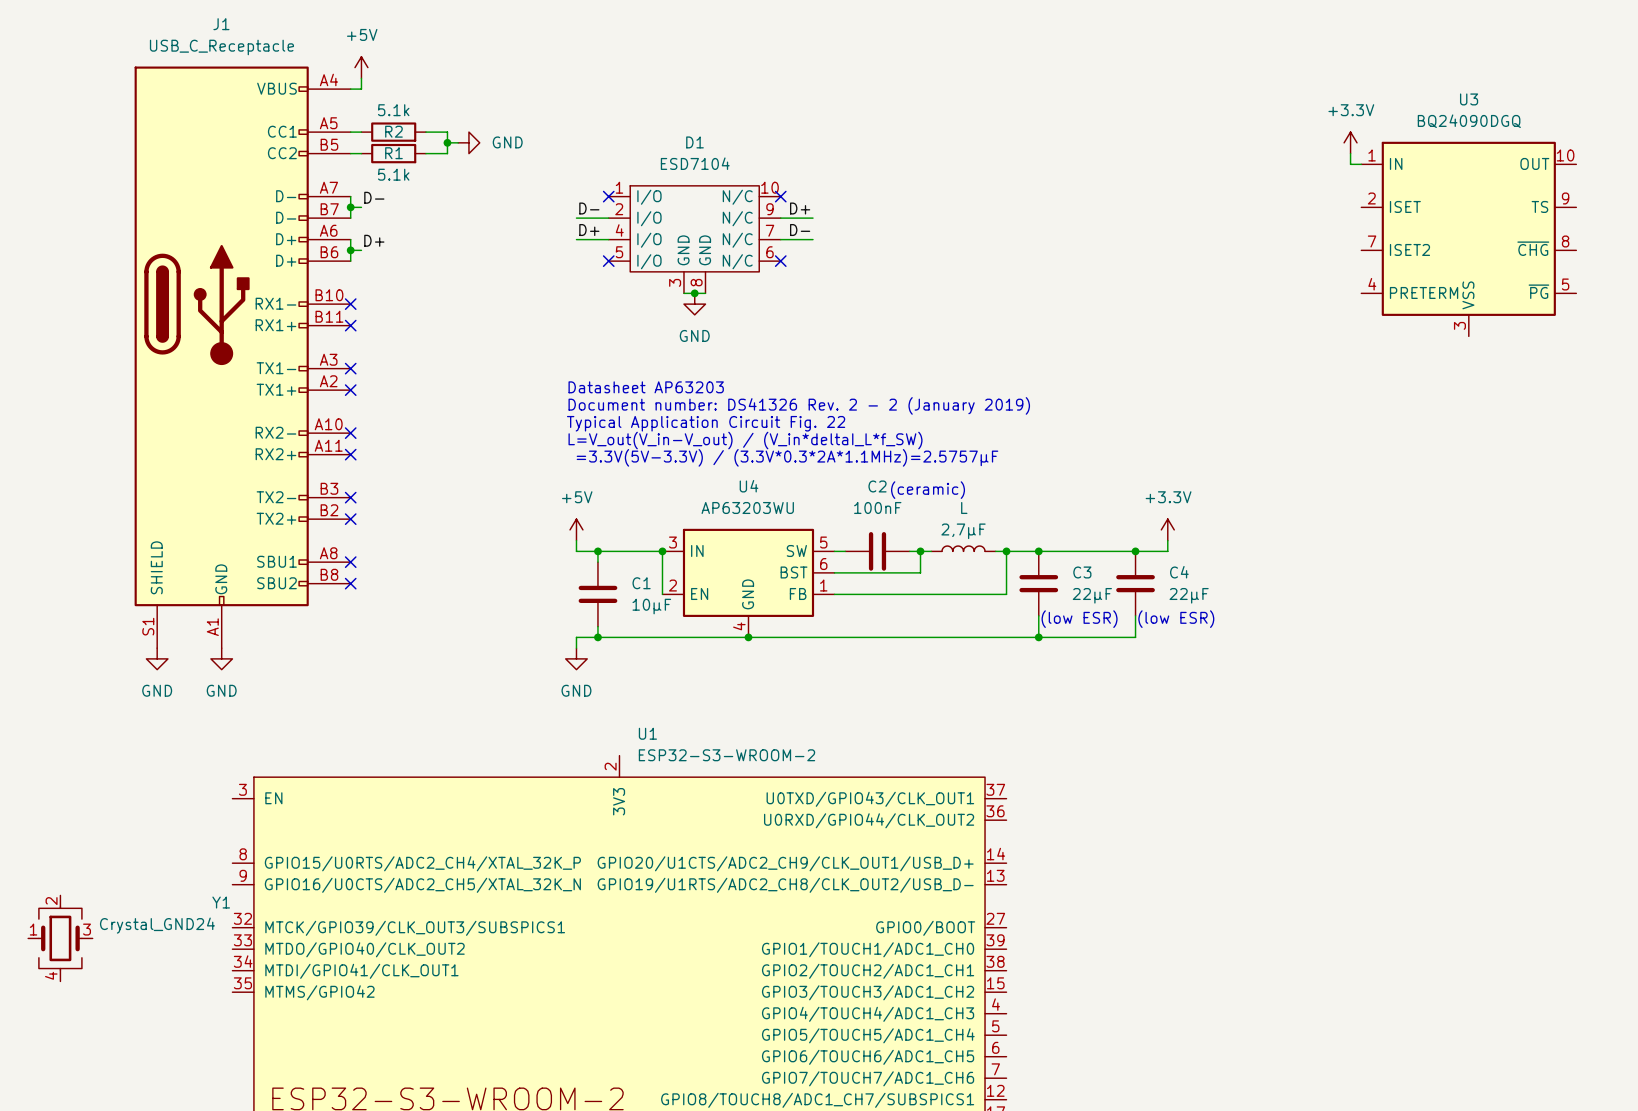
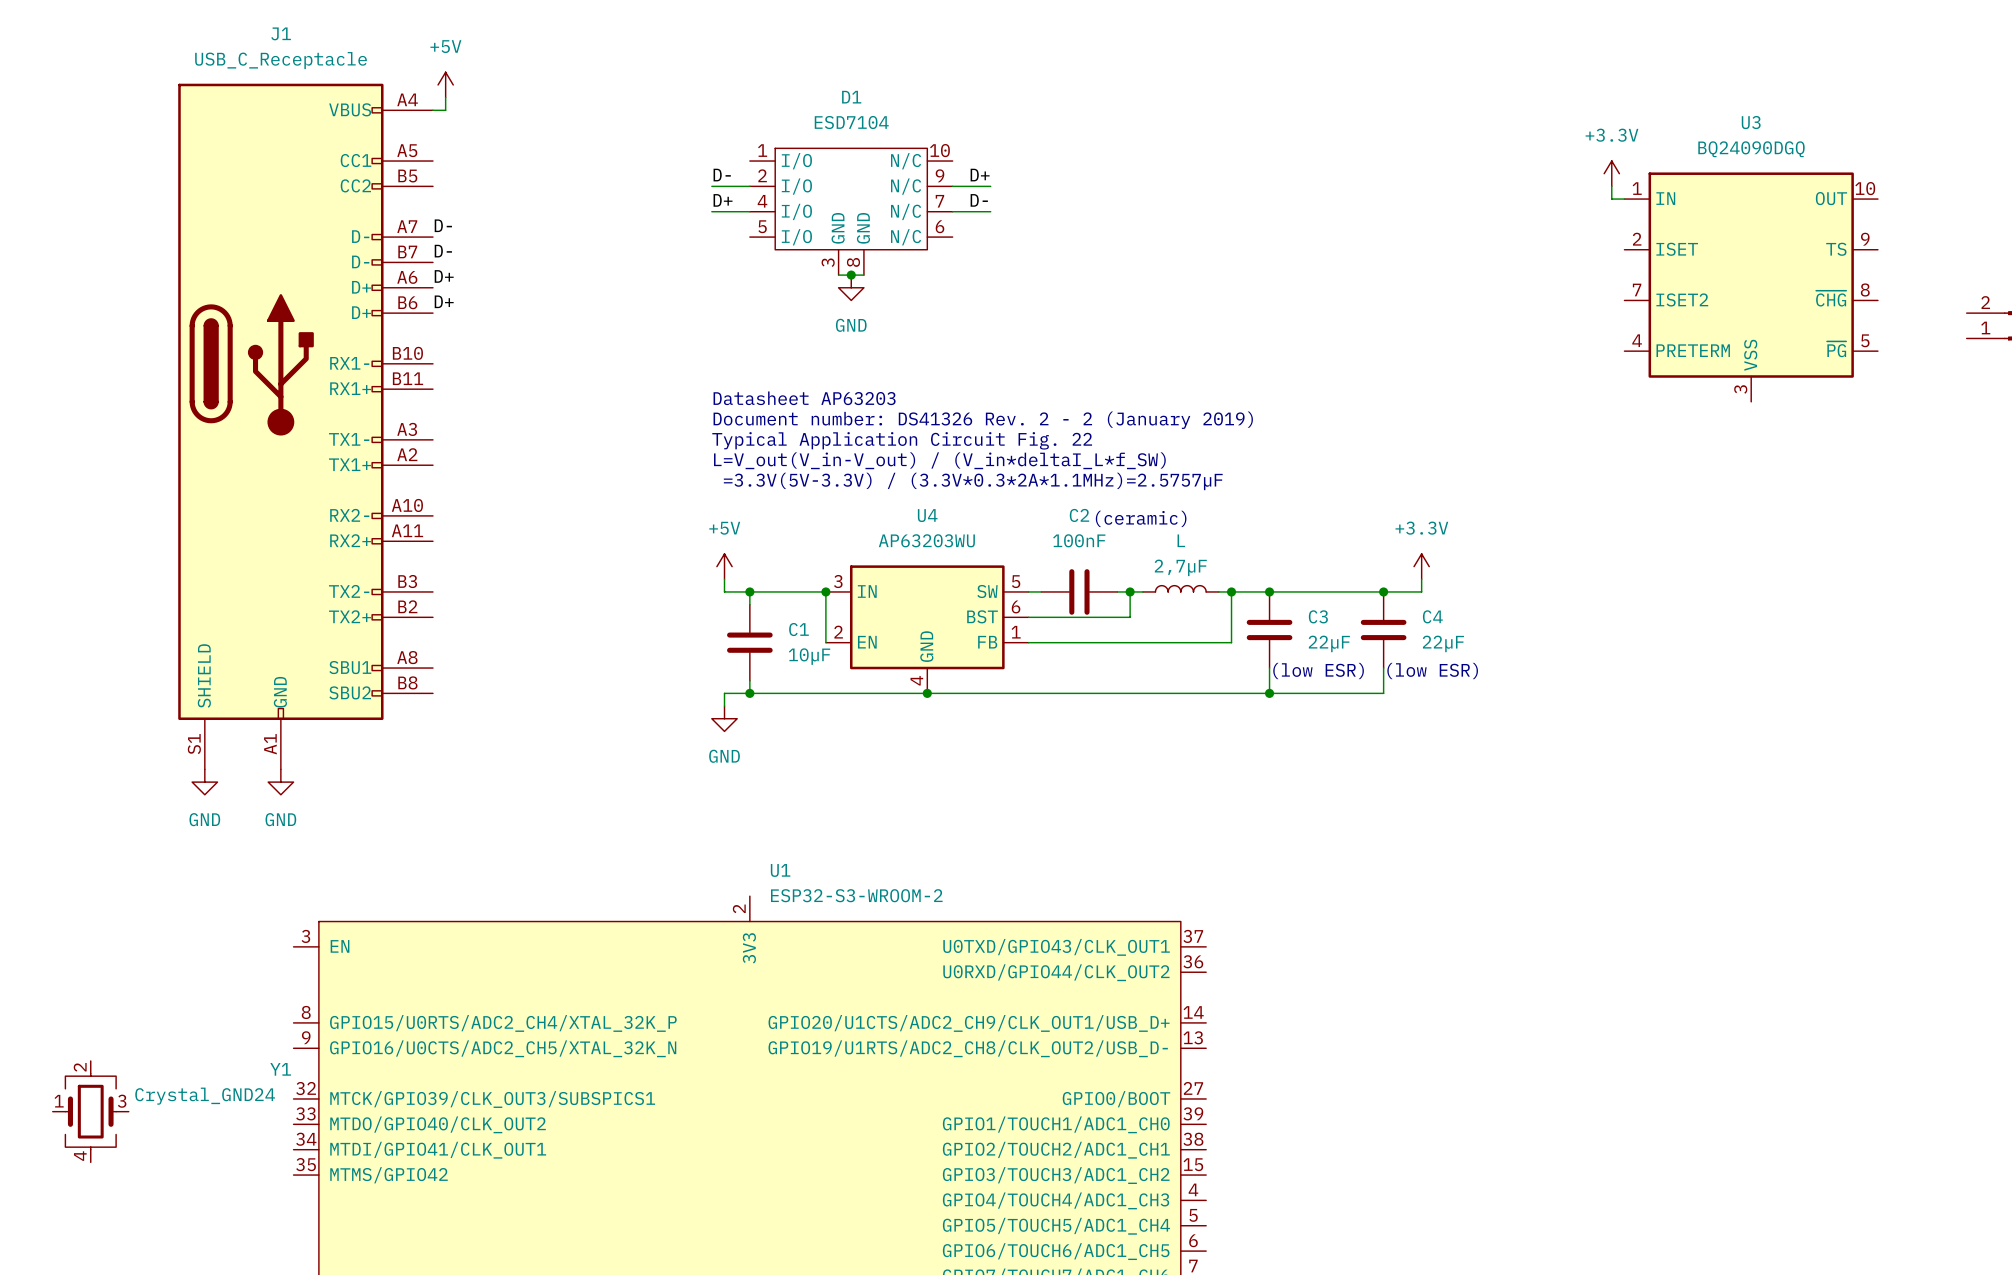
wire: (350, 132) (361, 132) -> none
R2: 5.1k (393, 132) -> none
wire: (425, 132) (447, 132) (447, 153) (425, 153) -> none
wire: (447, 142) (458, 142) -> none
junction: (447, 142) -> none
power symbol: GND (468, 142) -> none
wire: (350, 153) (361, 153) -> none
R1: 5.1k (393, 153) -> none
label: none -> D- (443, 225)
wire: (350, 196) (350, 218) -> none
no-connect mark: (608, 196) -> none
no-connect mark: (780, 196) -> none
label: D- (374, 197) -> none
wire: (350, 207) (361, 207) -> none
junction: (350, 207) -> none
label: none -> D- (443, 251)
label position: D- (589, 208) -> D- (722, 175)
label position: D+ (800, 208) -> D+ (980, 175)
wire: (576, 218) (608, 218) -> (711, 186) (749, 186)
wire: (780, 218) (813, 218) -> (952, 186) (990, 186)
junction: none -> (851, 275)
label: none -> D+ (444, 276)
label position: D+ (589, 230) -> D+ (723, 200)
label position: D- (800, 230) -> D- (979, 200)
wire: (350, 239) (350, 261) -> none
wire: (576, 239) (608, 239) -> (711, 211) (749, 211)
D1 position: (694, 239) -> (851, 211)
wire: (780, 239) (813, 239) -> (952, 211) (990, 211)
label: D+ (374, 240) -> none
wire: (350, 250) (361, 250) -> none
junction: (350, 250) -> none
label: none -> D+ (444, 301)
no-connect mark: (608, 261) -> none
no-connect mark: (780, 261) -> none
wire: (683, 293) (705, 293) -> (838, 275) (863, 275)
junction: (694, 293) -> none
no-connect mark: (350, 304) -> none
power symbol position: GND (694, 304) -> GND (851, 287)
no-connect mark: (350, 325) -> none
no-connect mark: (350, 368) -> none
text position: Datasheet AP63203 (646, 387) -> Datasheet AP63203 (804, 398)
no-connect mark: (350, 390) -> none
text position: Document number: DS41326 Rev. 2 - 2 (January 2019) (799, 405) -> Document number: DS41326 Rev. 2 - 2 (January 2019) (983, 420)
text position: Typical Application Circuit Fig. 22 (706, 423) -> Typical Application Circuit Fig. 22 (902, 440)
no-connect mark: (350, 433) -> none
text position: L=V_out(V_in-V_out) / (V_in*deltaI_L*f_SW) (745, 440) -> L=V_out(V_in-V_out) / (V_in*deltaI_L*f_SW) (939, 460)
no-connect mark: (350, 454) -> none
text position: =3.3V(5V-3.3V) / (3.3V*0.3*2A*1.1MHz)=2.5757µF (787, 457) -> =3.3V(5V-3.3V) / (3.3V*0.3*2A*1.1MHz)=2.5757µF (973, 481)
text position: (ceramic) (928, 490) -> (ceramic) (1141, 518)
no-connect mark: (350, 497) -> none
junction: none -> (749, 591)
junction: none -> (825, 591)
junction: none -> (1130, 591)
junction: none -> (1231, 591)
junction: none -> (1269, 591)
junction: none -> (1383, 591)
no-connect mark: (350, 519) -> none
power symbol position: +5V (576, 529) -> +5V (724, 566)
power symbol position: +3.3V (1167, 529) -> +3.3V (1421, 566)
wire: (576, 540) (576, 551) (662, 551) (662, 594) -> (724, 579) (724, 591) (825, 591) (825, 642)
wire: (1167, 540) (1167, 551) (995, 551) -> (1421, 579) (1421, 591) (1218, 591)
L position: (963, 548) -> (1180, 588)
wire: (597, 551) (597, 562) -> (749, 591) (749, 604)
junction: (597, 551) -> none
junction: (662, 551) -> none
wire: (834, 551) (845, 551) -> (1028, 591) (1041, 591)
C2 position: (877, 551) -> (1079, 591)
wire: (909, 551) (931, 551) -> (1117, 591) (1142, 591)
wire: (920, 551) (920, 572) (834, 572) -> (1130, 591) (1130, 617) (1028, 617)
junction: (920, 551) -> none
wire: (1006, 551) (1006, 594) (834, 594) -> (1231, 591) (1231, 642) (1028, 642)
junction: (1006, 551) -> none
junction: (1038, 551) -> none
junction: (1135, 551) -> none
no-connect mark: (350, 562) -> none
text: none -> (low ESR) (1318, 671)
text: none -> (low ESR) (1432, 671)
no-connect mark: (350, 583) -> none
junction: none -> (749, 693)
U4 position: (748, 583) -> (927, 629)
junction: none -> (927, 693)
C3 position: (1038, 583) -> (1269, 630)
junction: none -> (1269, 693)
C4 position: (1135, 583) -> (1383, 630)
C1 position: (597, 594) -> (749, 642)
wire: (1038, 615) (1038, 637) -> (1269, 668) (1269, 693)
wire: (1135, 615) (1135, 637) (576, 637) (576, 648) -> (1383, 668) (1383, 693) (724, 693) (724, 706)
text: (low ESR) (1079, 619) -> none
text: (low ESR) (1176, 619) -> none
wire: (597, 626) (597, 637) -> (749, 680) (749, 693)
junction: (597, 637) -> none
junction: (748, 637) -> none
junction: (1038, 637) -> none
power symbol position: GND (576, 658) -> GND (724, 718)

